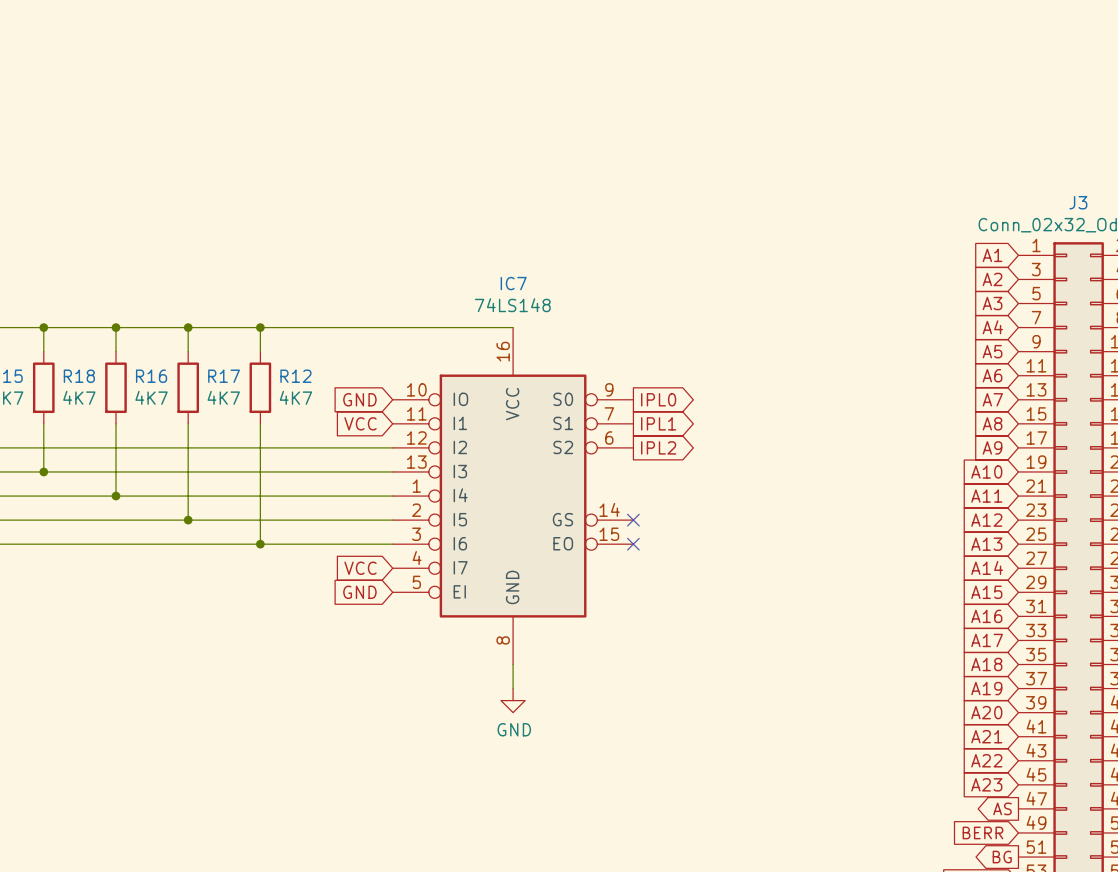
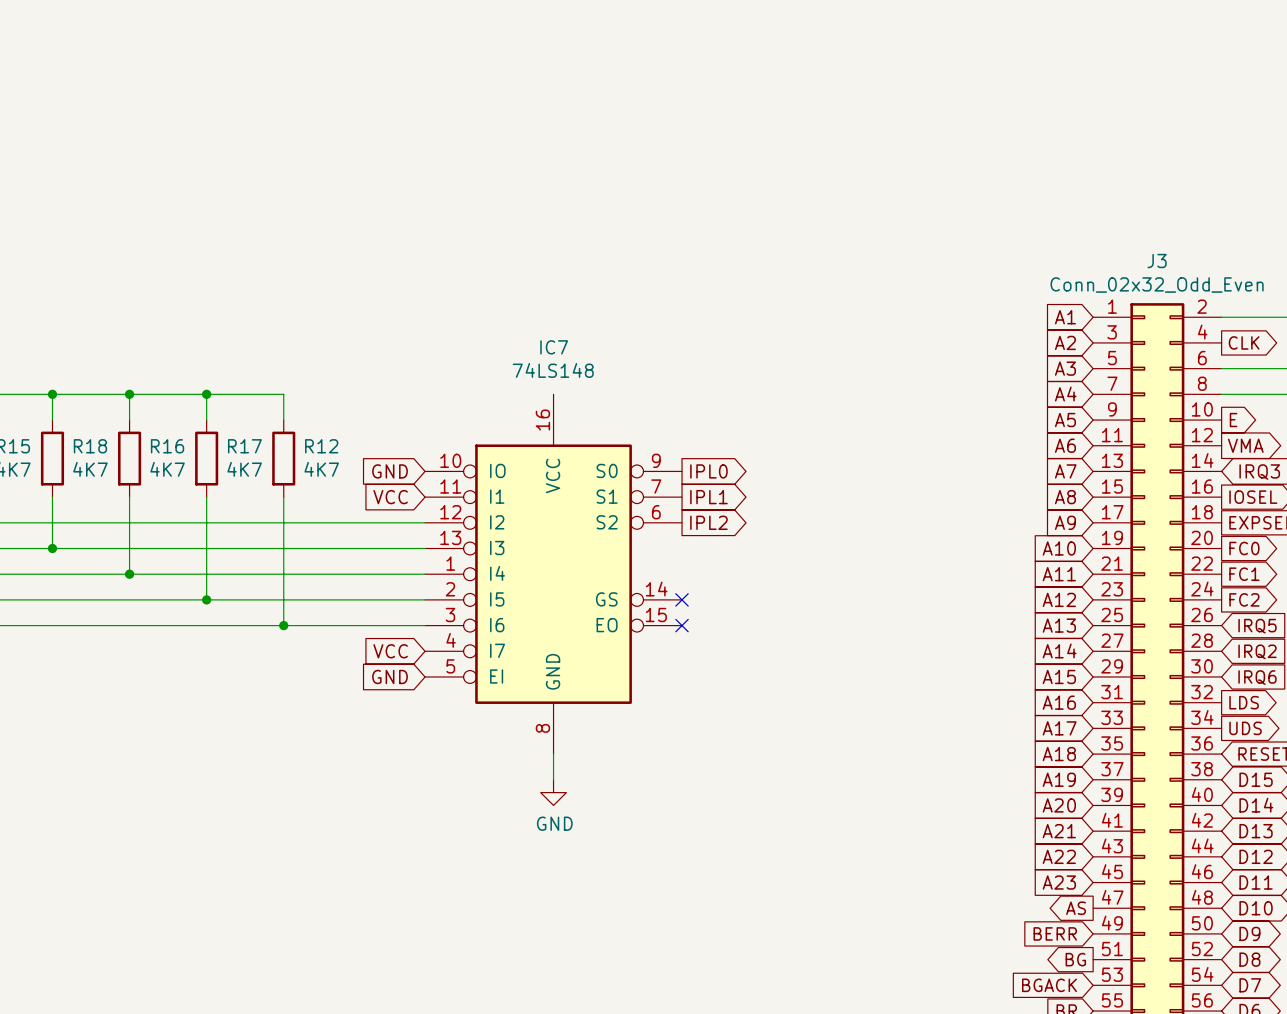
wire: (260, 327) (513, 327) -> none
junction: (260, 327) -> none

